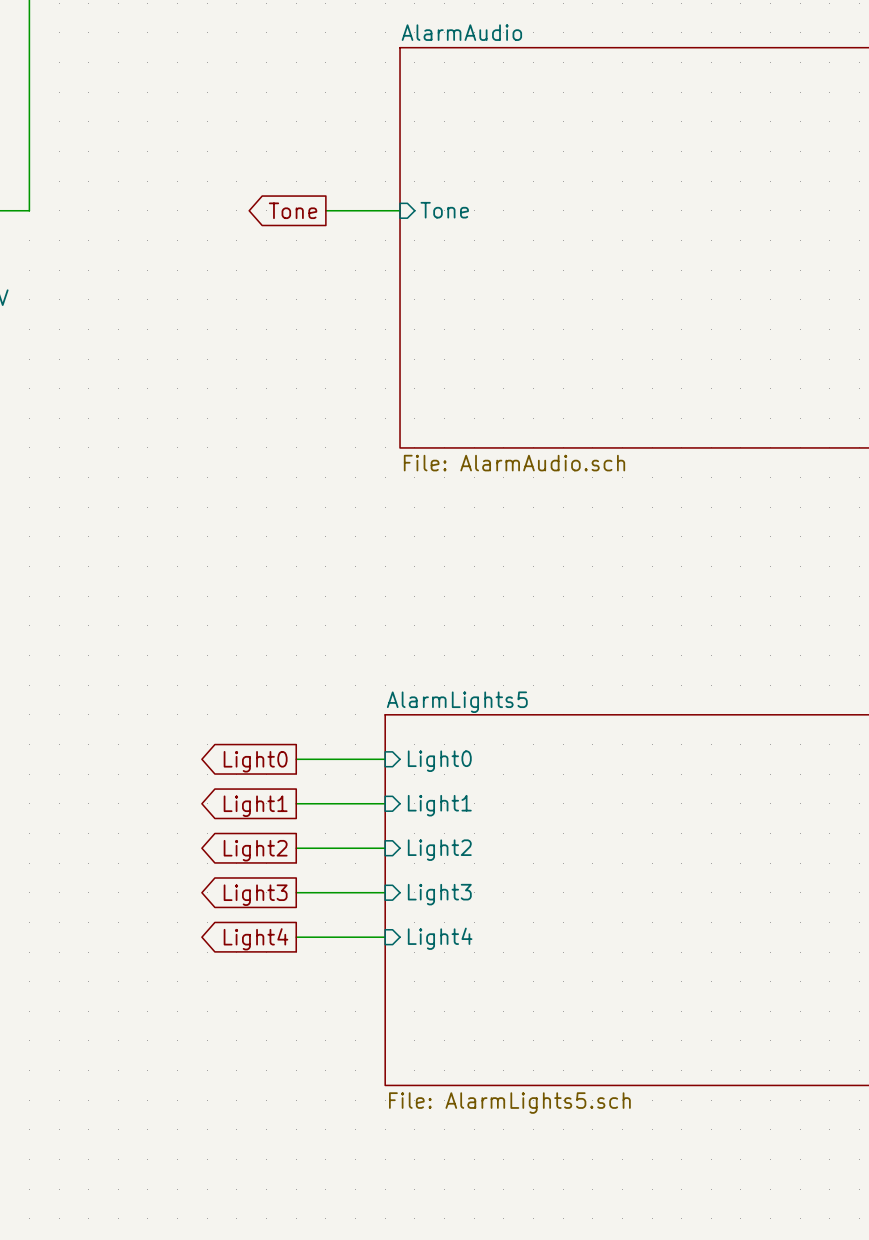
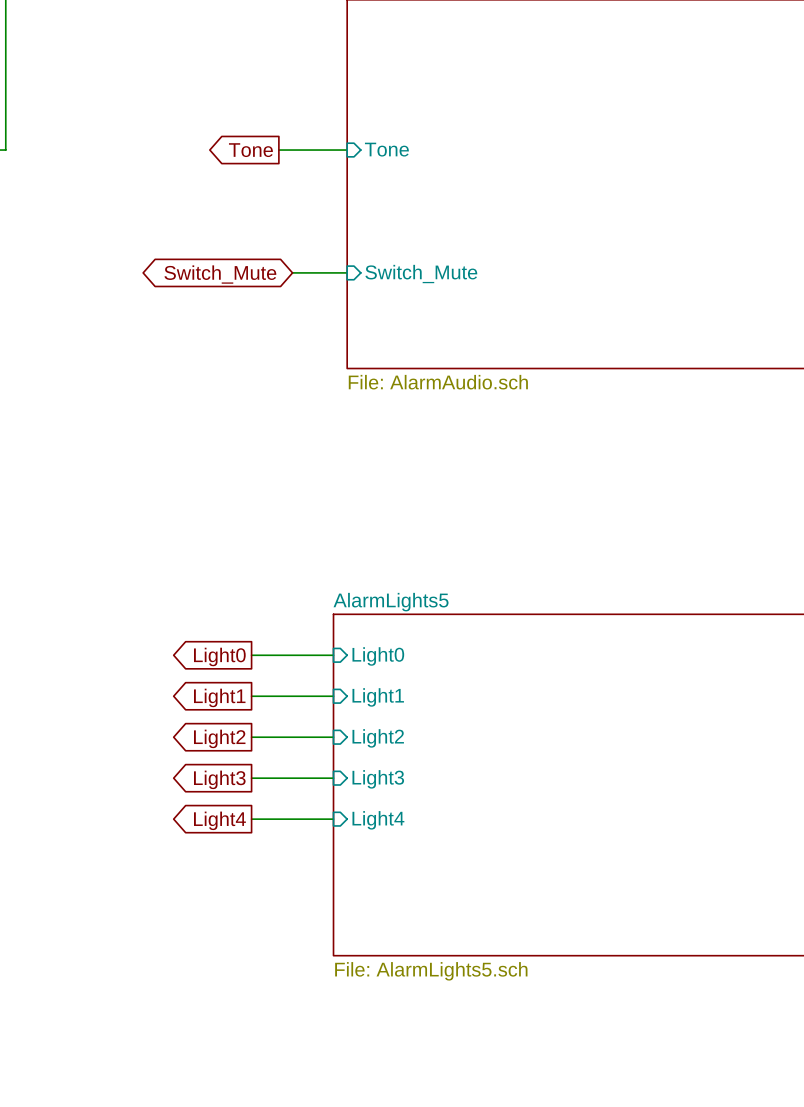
global label: none -> Switch_Mute (220, 274)
wire: none -> (292, 272) (347, 272)
sheet pin: none -> Switch_Mute (421, 274)

